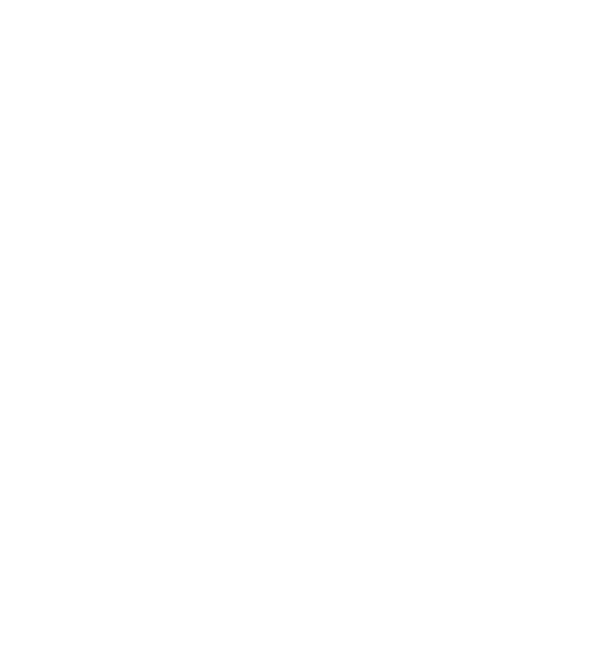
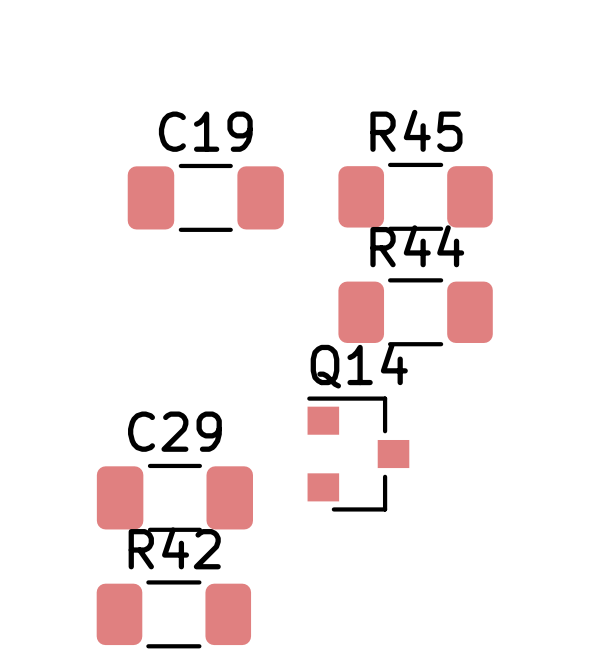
R45: none -> (415, 196)
C19: none -> (205, 197)
R44: none -> (415, 312)
Q14: none -> (358, 454)
C29: none -> (174, 497)
R42: none -> (173, 614)

